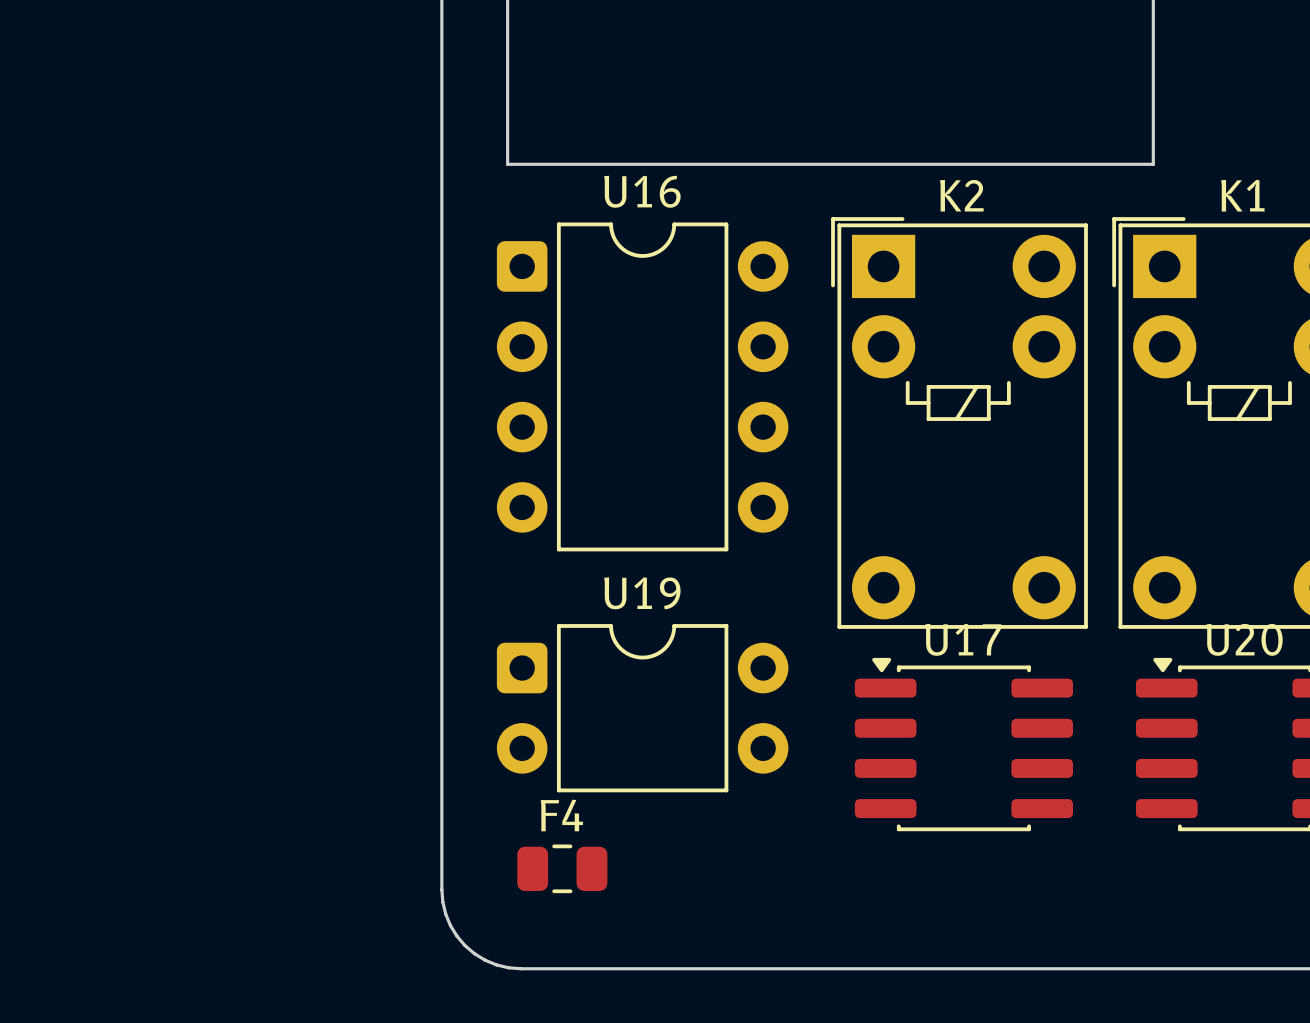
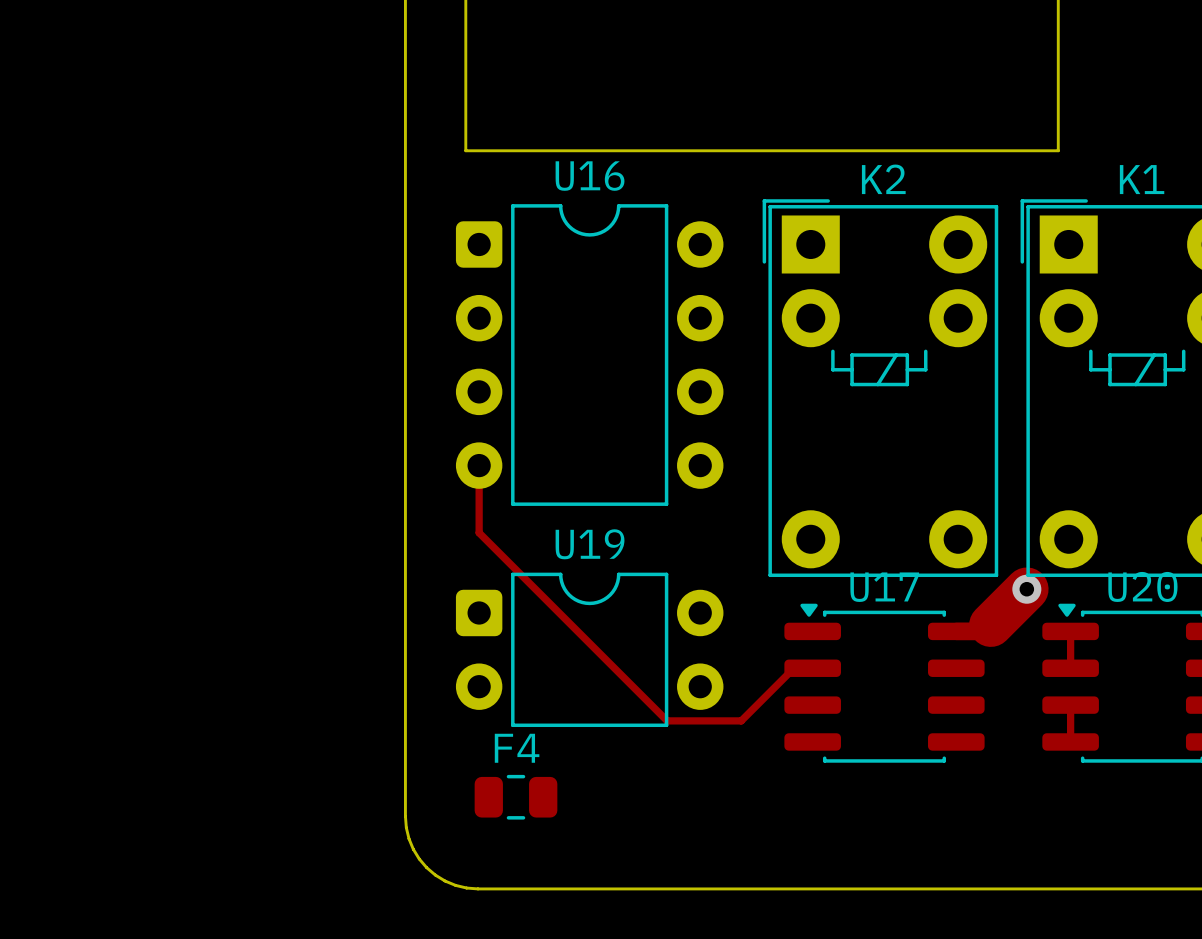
track: none -> (479, 465) (479, 532) (667, 720) (741, 720) (793, 668) (812, 668)
track: none -> (1026, 589) (984, 631) (956, 631)
via: none -> (1026, 589)
track: none -> (1070, 631) (1070, 668)
track: none -> (1070, 705) (1070, 741)

